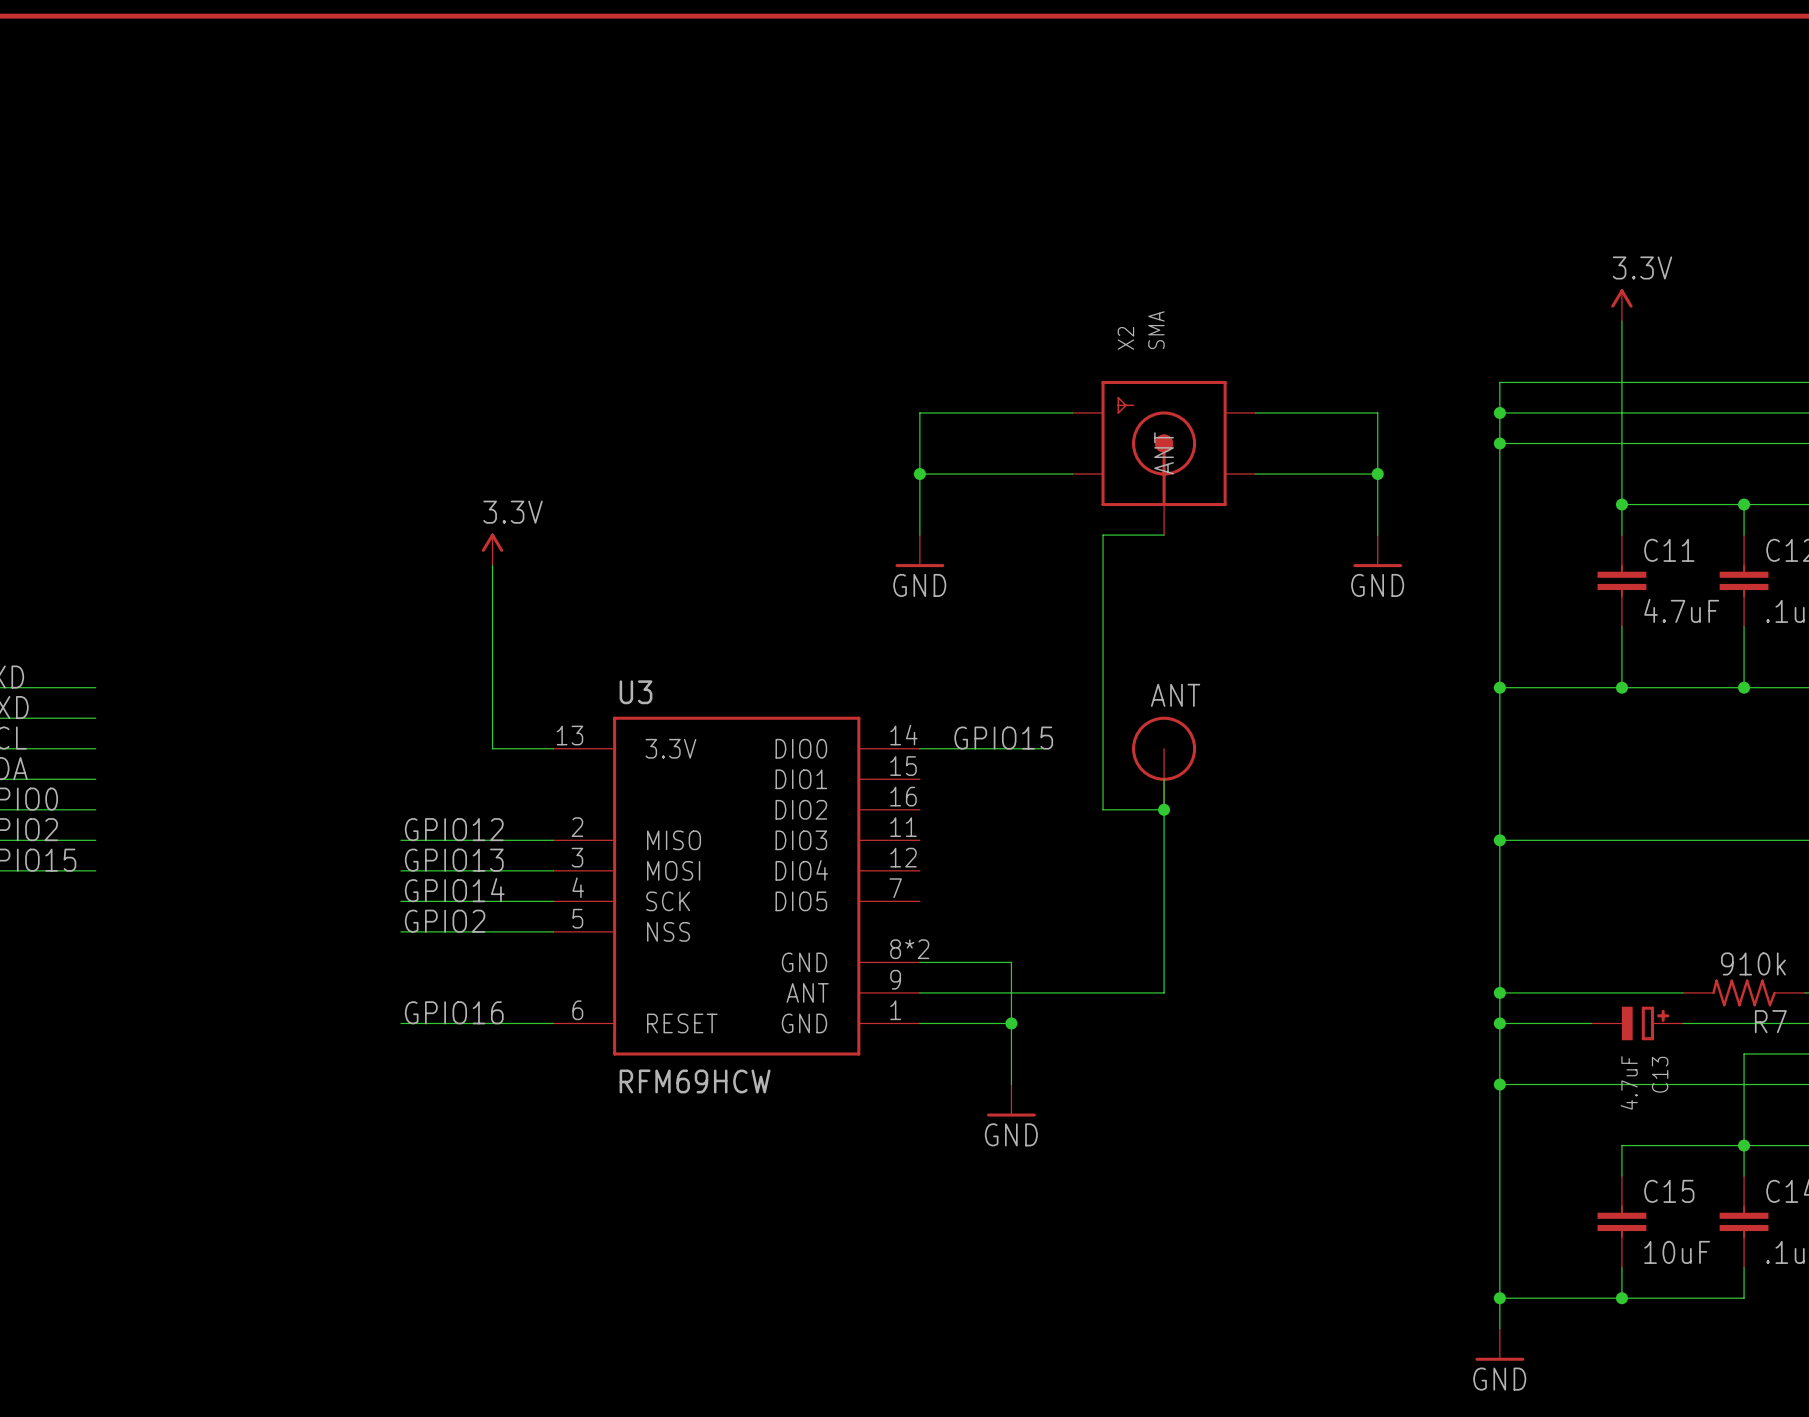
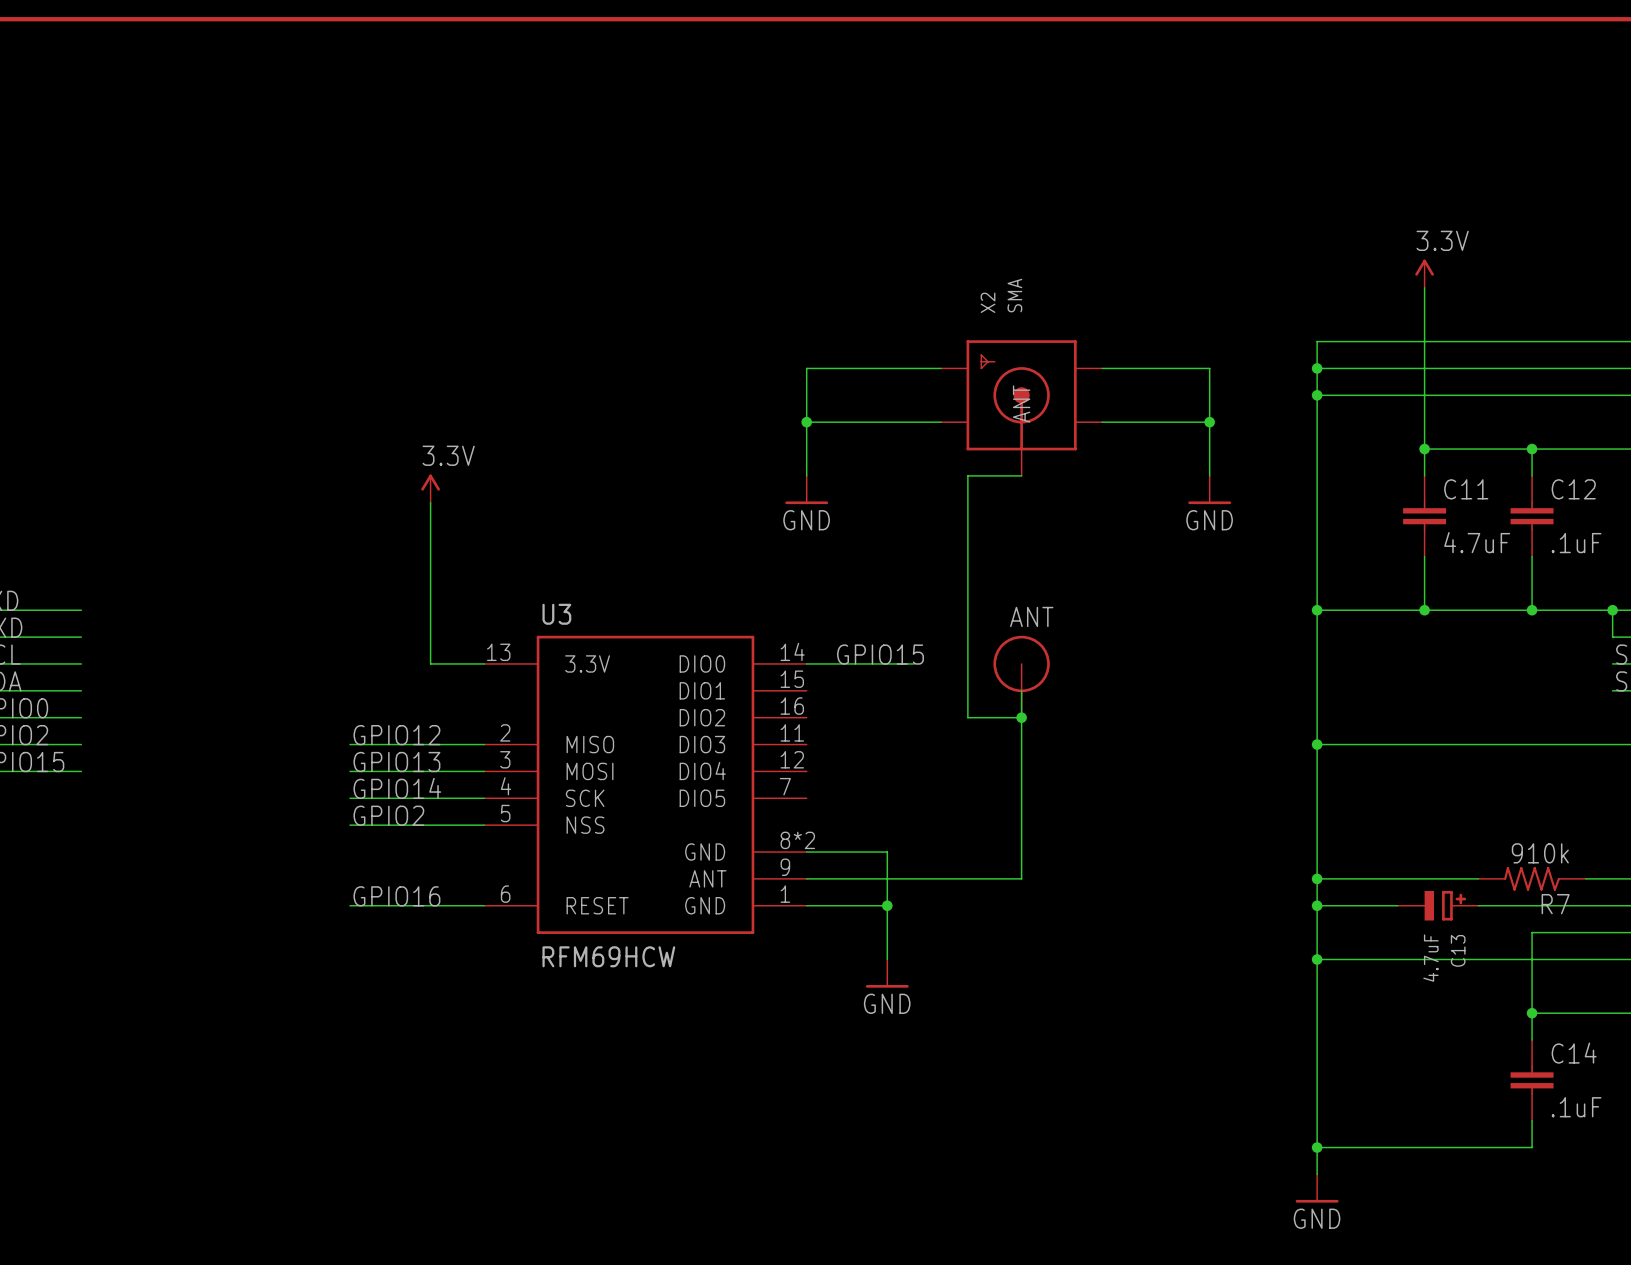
wire: (1744, 1145) (1621, 1145) (1621, 1176) -> none
C15: 10uF (1621, 1221) -> none
wire: (1621, 1267) (1621, 1298) -> none
junction: (1621, 1298) -> none

